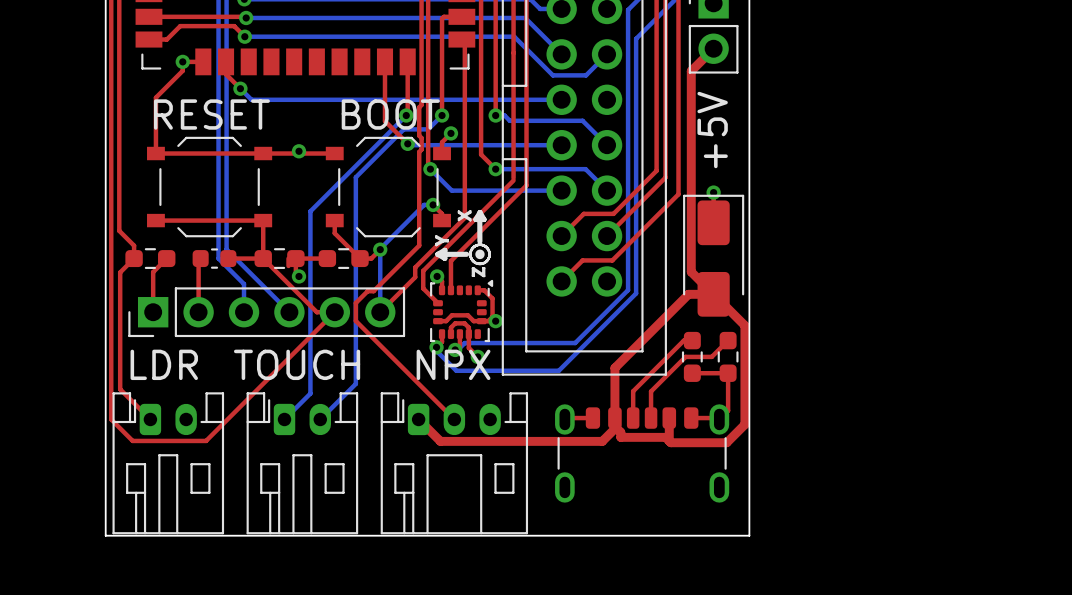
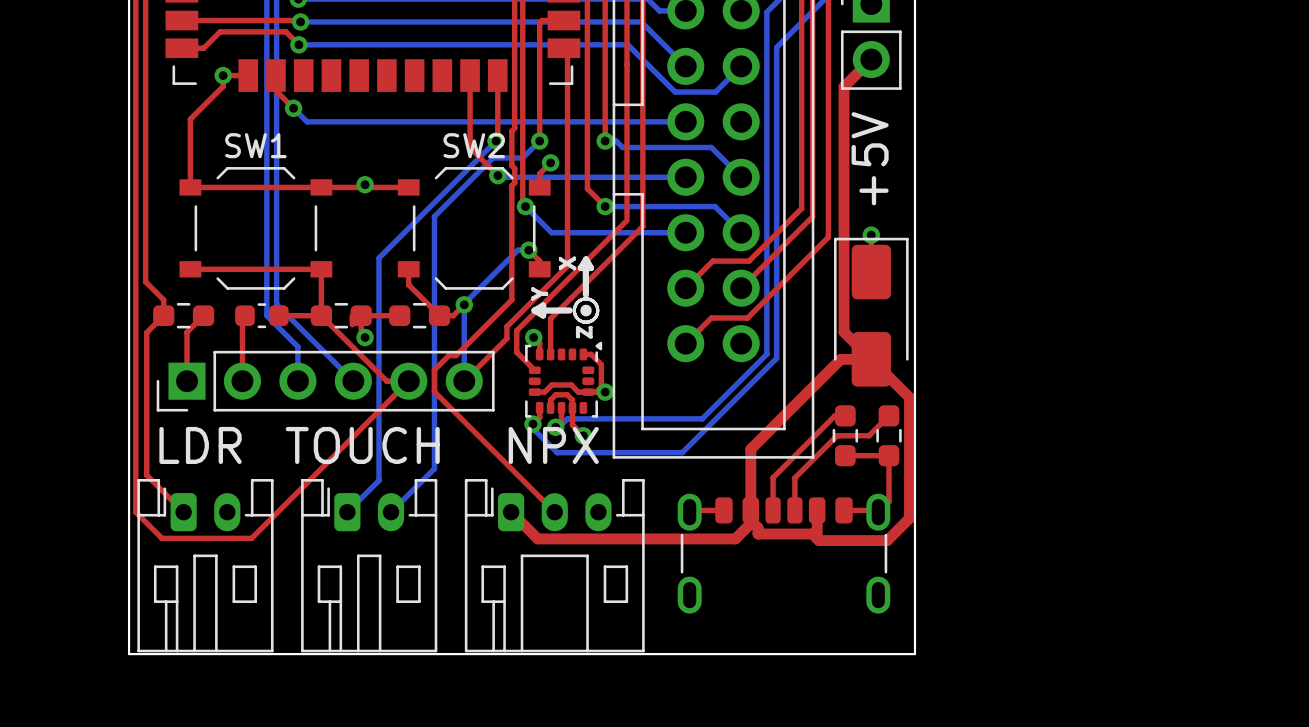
text: RESET (211, 114) -> none
text: BOOT (390, 114) -> none
SW1 name: none -> SW1 (255, 145)
SW2 name: none -> SW2 (474, 145)

